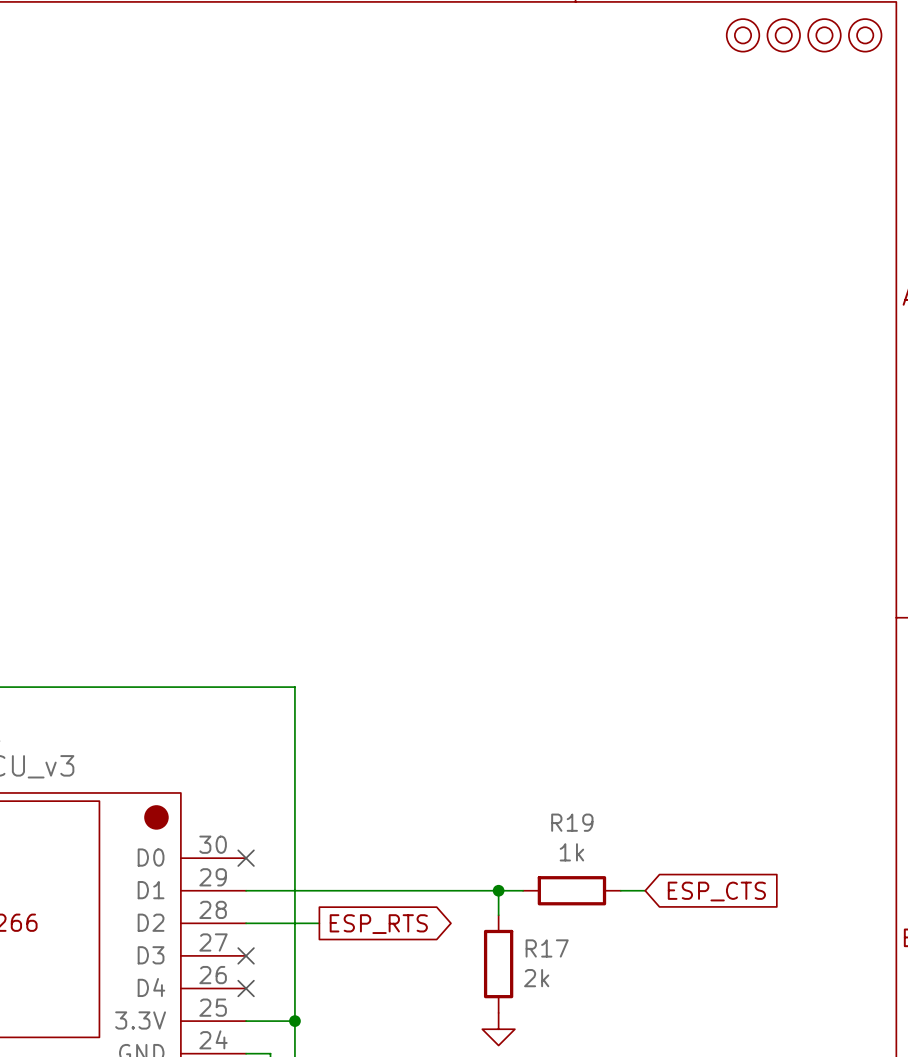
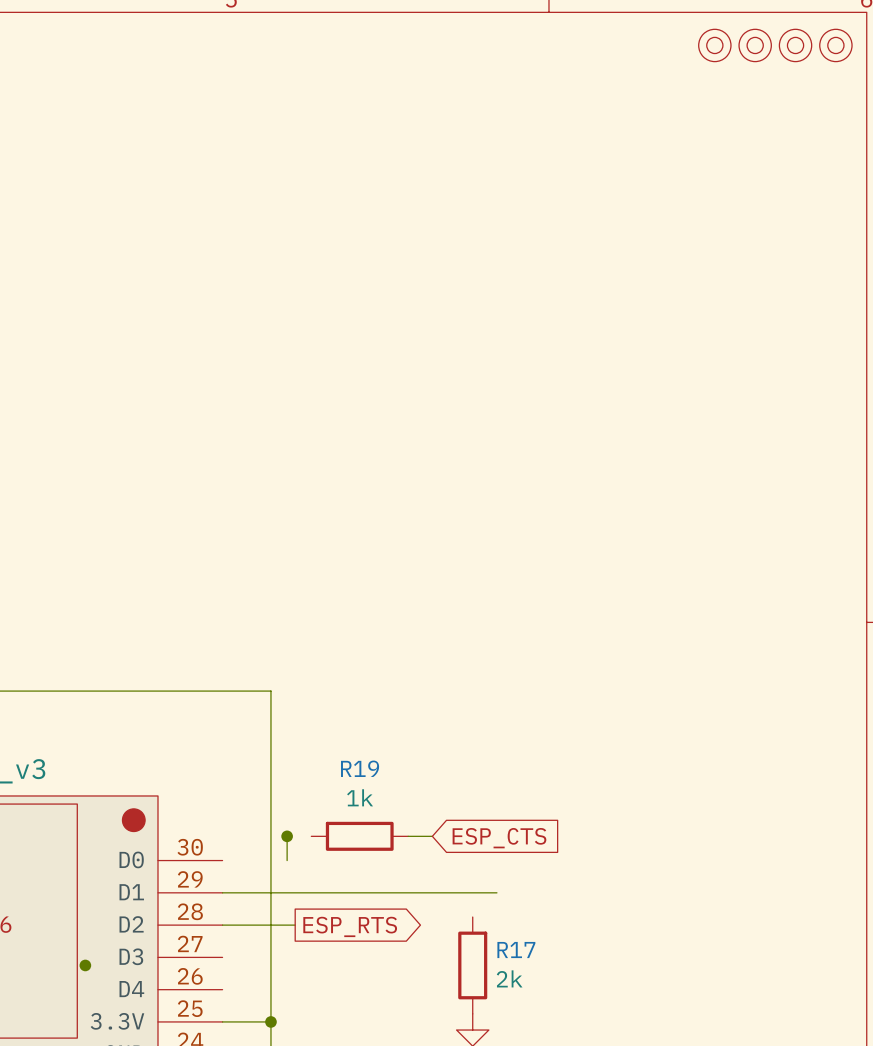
junction: none -> (287, 836)
no-connect mark: (246, 858) -> none
wire: (498, 890) (498, 915) -> (287, 836) (287, 860)
junction: (498, 890) -> none
R19 position: (571, 890) -> (359, 836)
wire: (620, 890) (645, 890) -> (408, 836) (432, 836)
global label position: ESP_CTS (716, 891) -> ESP_CTS (499, 838)
no-connect mark: (246, 955) -> none
junction: none -> (85, 965)
no-connect mark: (246, 988) -> none

